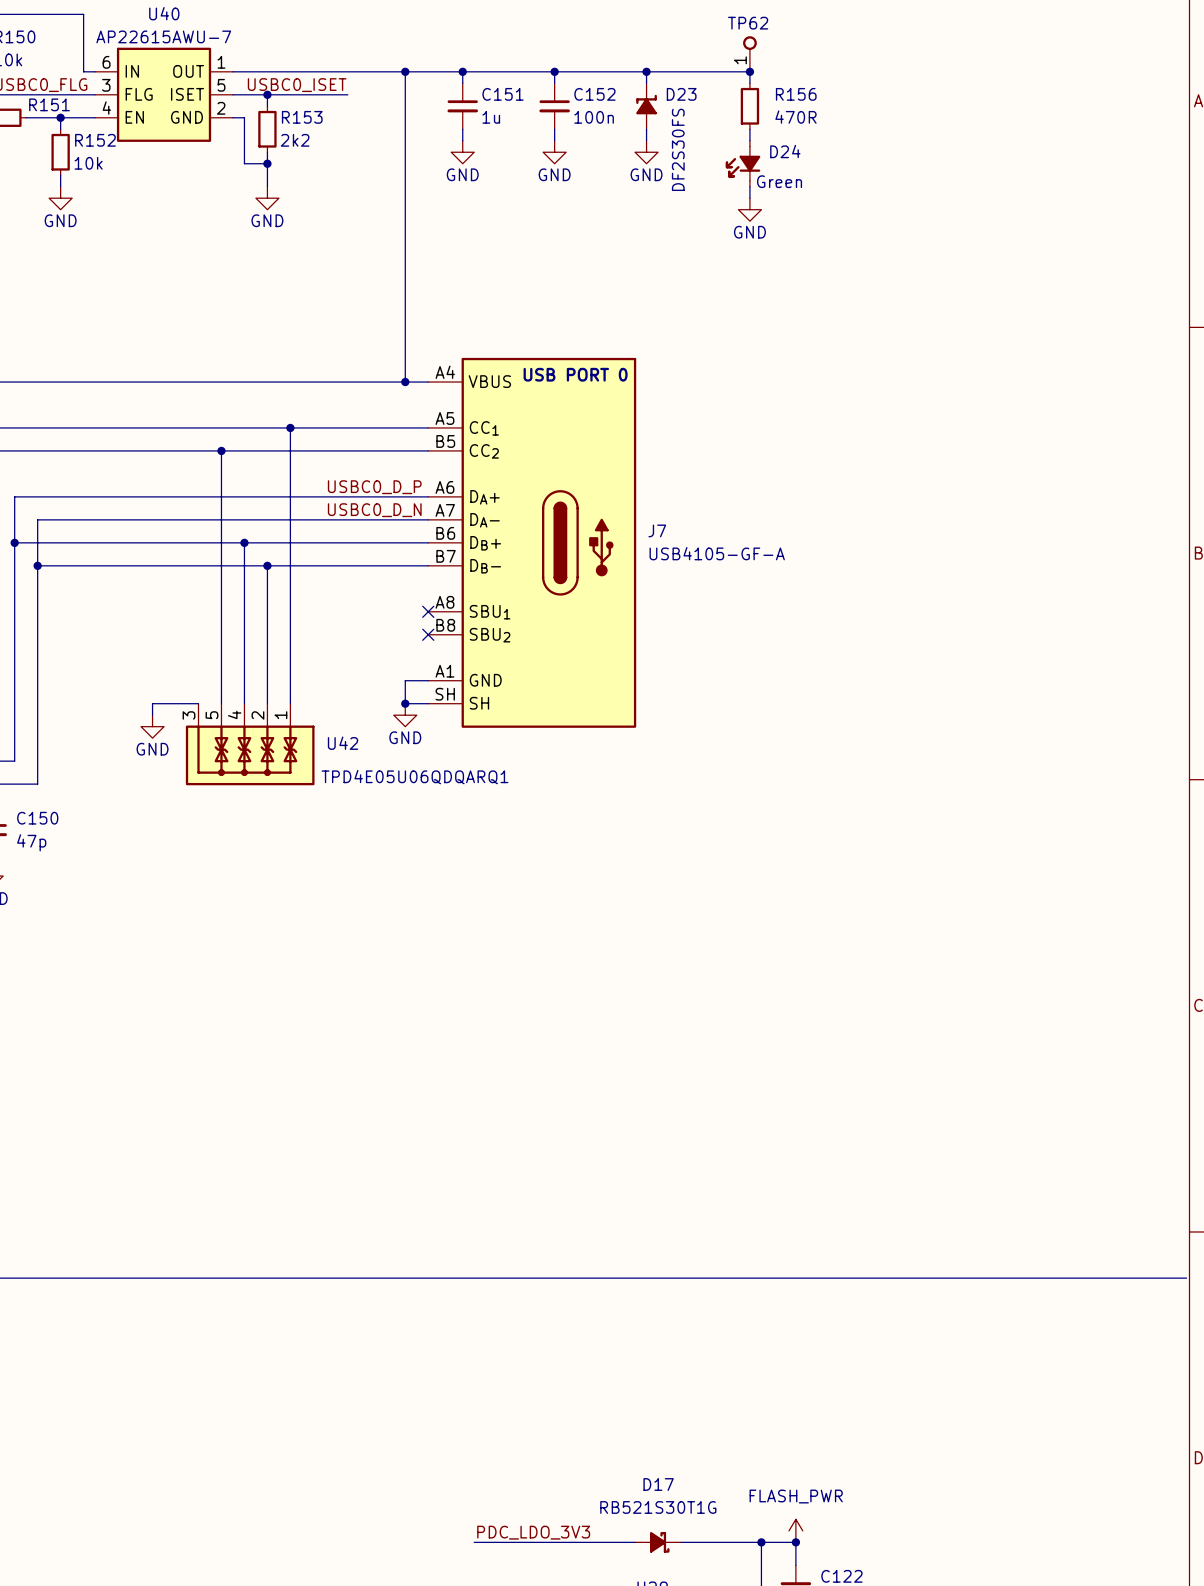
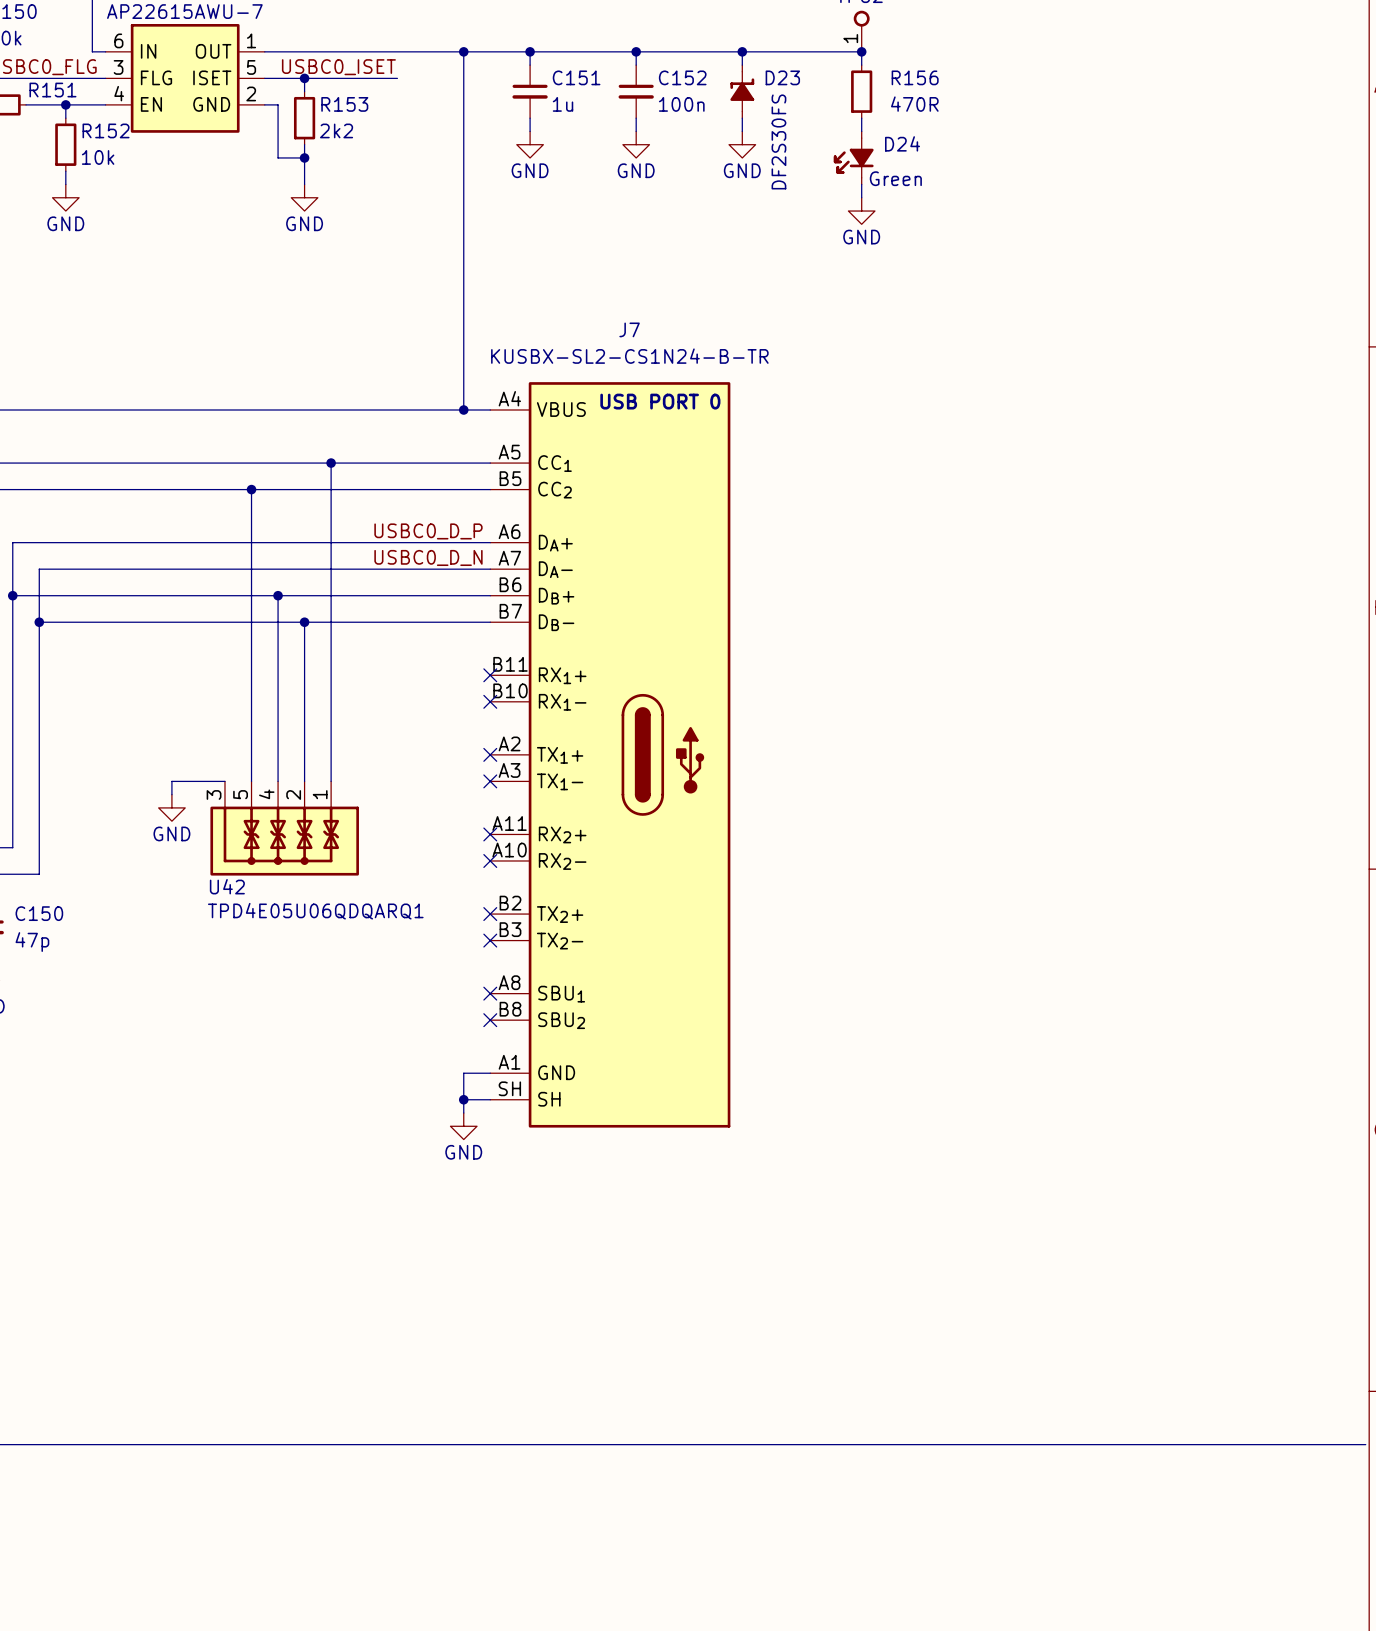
J7 symbol: [428, 357, 637, 728] -> [490, 382, 731, 1128]
J7 name position: J7 (657, 530) -> J7 (629, 329)
J7 text: USB4105-GF-A (717, 553) -> KUSBX-SL2-CS1N24-B-TR (629, 356)
wire: (428, 680) (405, 680) (405, 703) (428, 703) -> none
no-connect mark: none -> (490, 754)
junction: (405, 703) -> none
no-connect mark: none -> (490, 781)
power symbol: GND (405, 715) -> none
U42 name position: U42 (343, 743) -> U42 (227, 886)
no-connect mark: none -> (490, 834)
no-connect mark: none -> (490, 860)
U42 text position: TPD4E05U06QDQARQ1 (414, 777) -> TPD4E05U06QDQARQ1 (315, 911)
no-connect mark: none -> (490, 914)
no-connect mark: none -> (490, 940)
no-connect mark: none -> (490, 993)
no-connect mark: none -> (490, 1020)
wire: none -> (490, 1073) (463, 1073) (463, 1113)
wire: none -> (463, 1099) (490, 1099)
junction: none -> (463, 1099)
power symbol: none -> GND (463, 1126)

